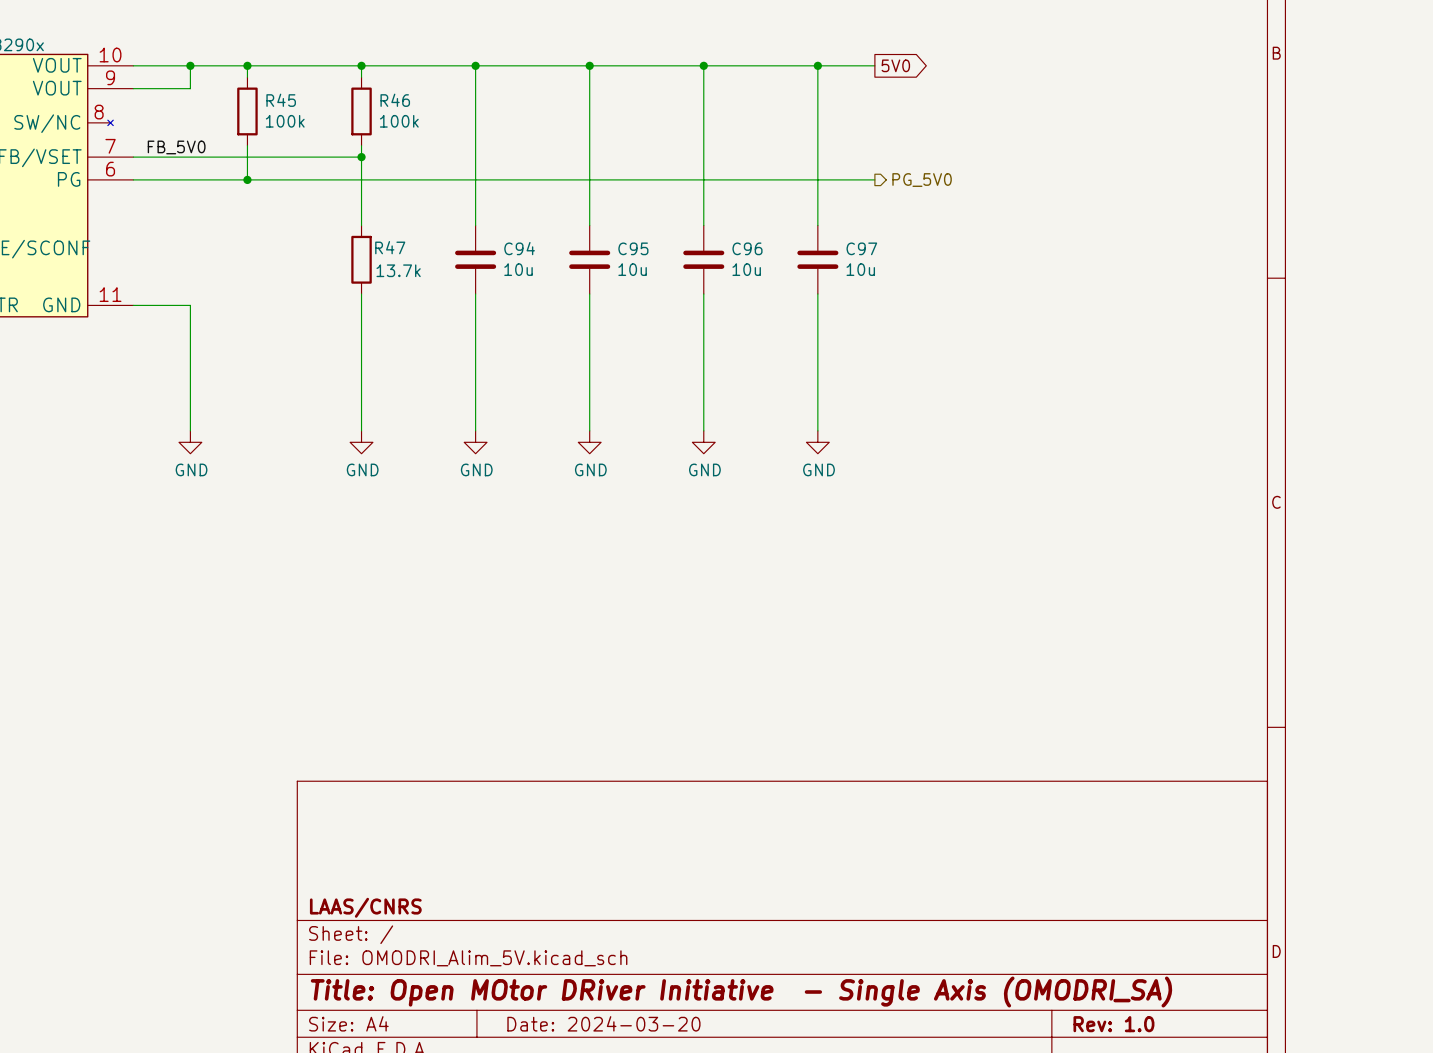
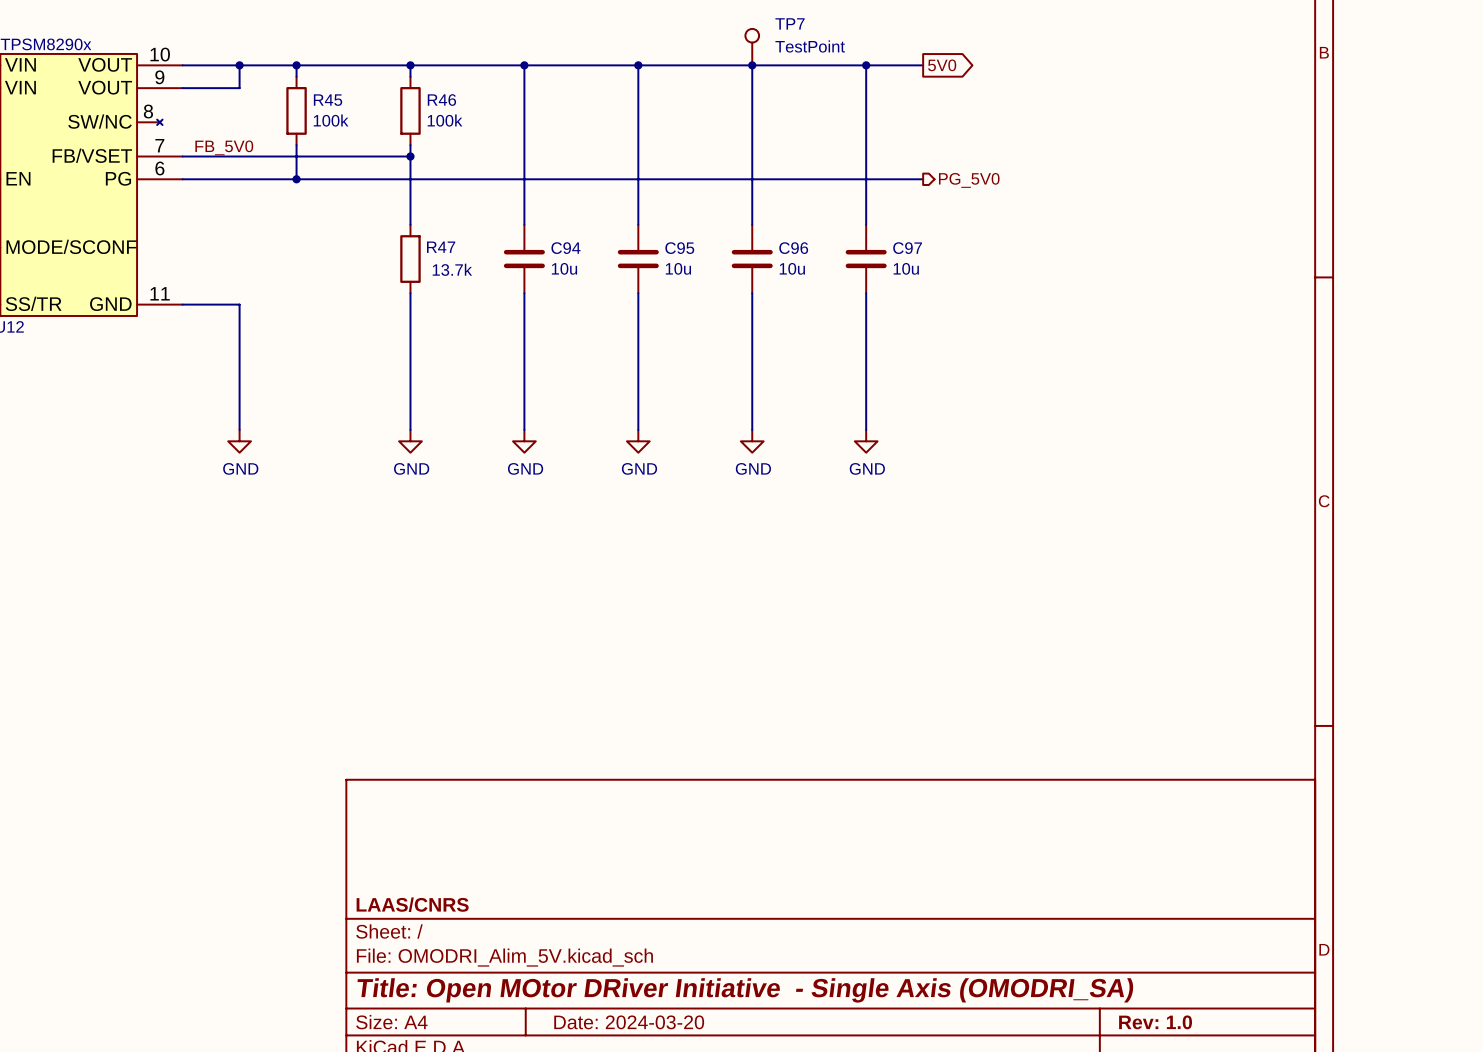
TP7: none -> TestPoint (752, 47)

